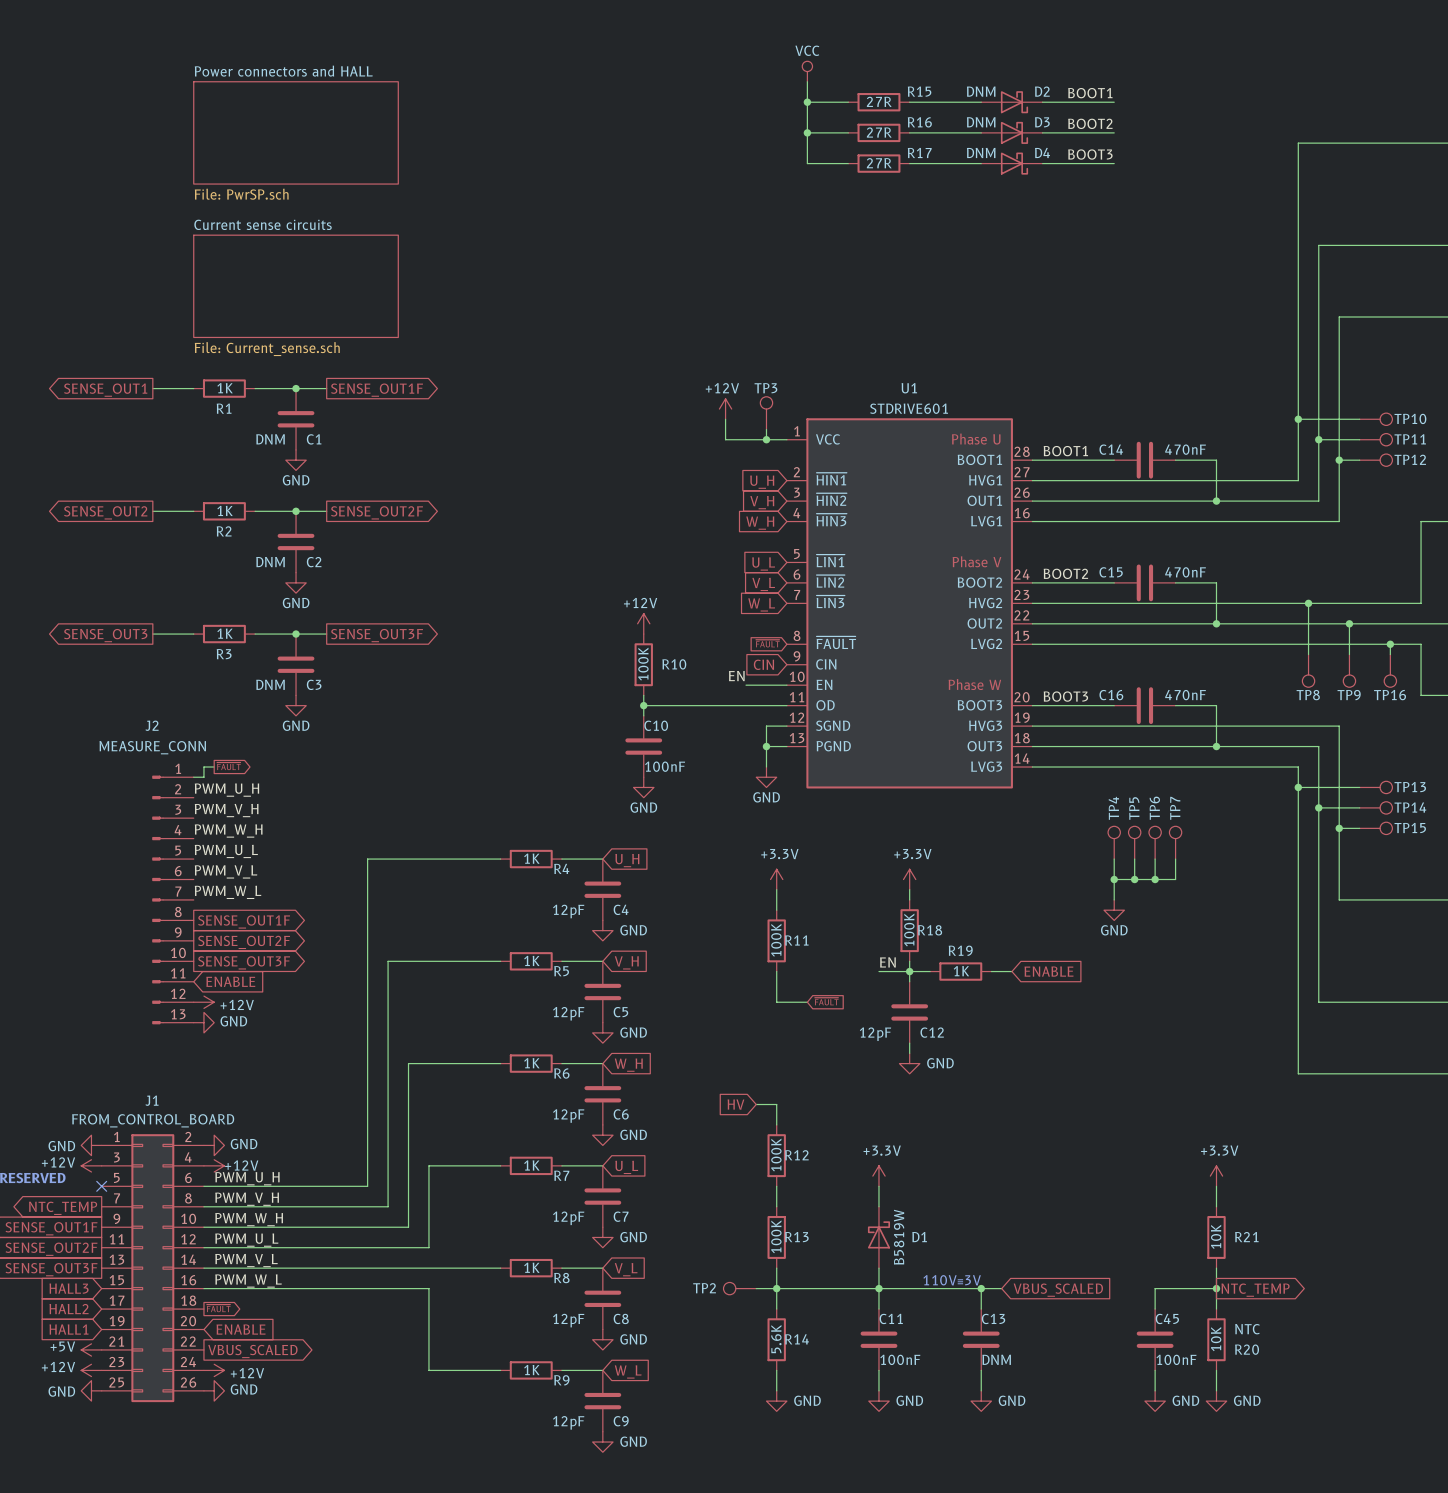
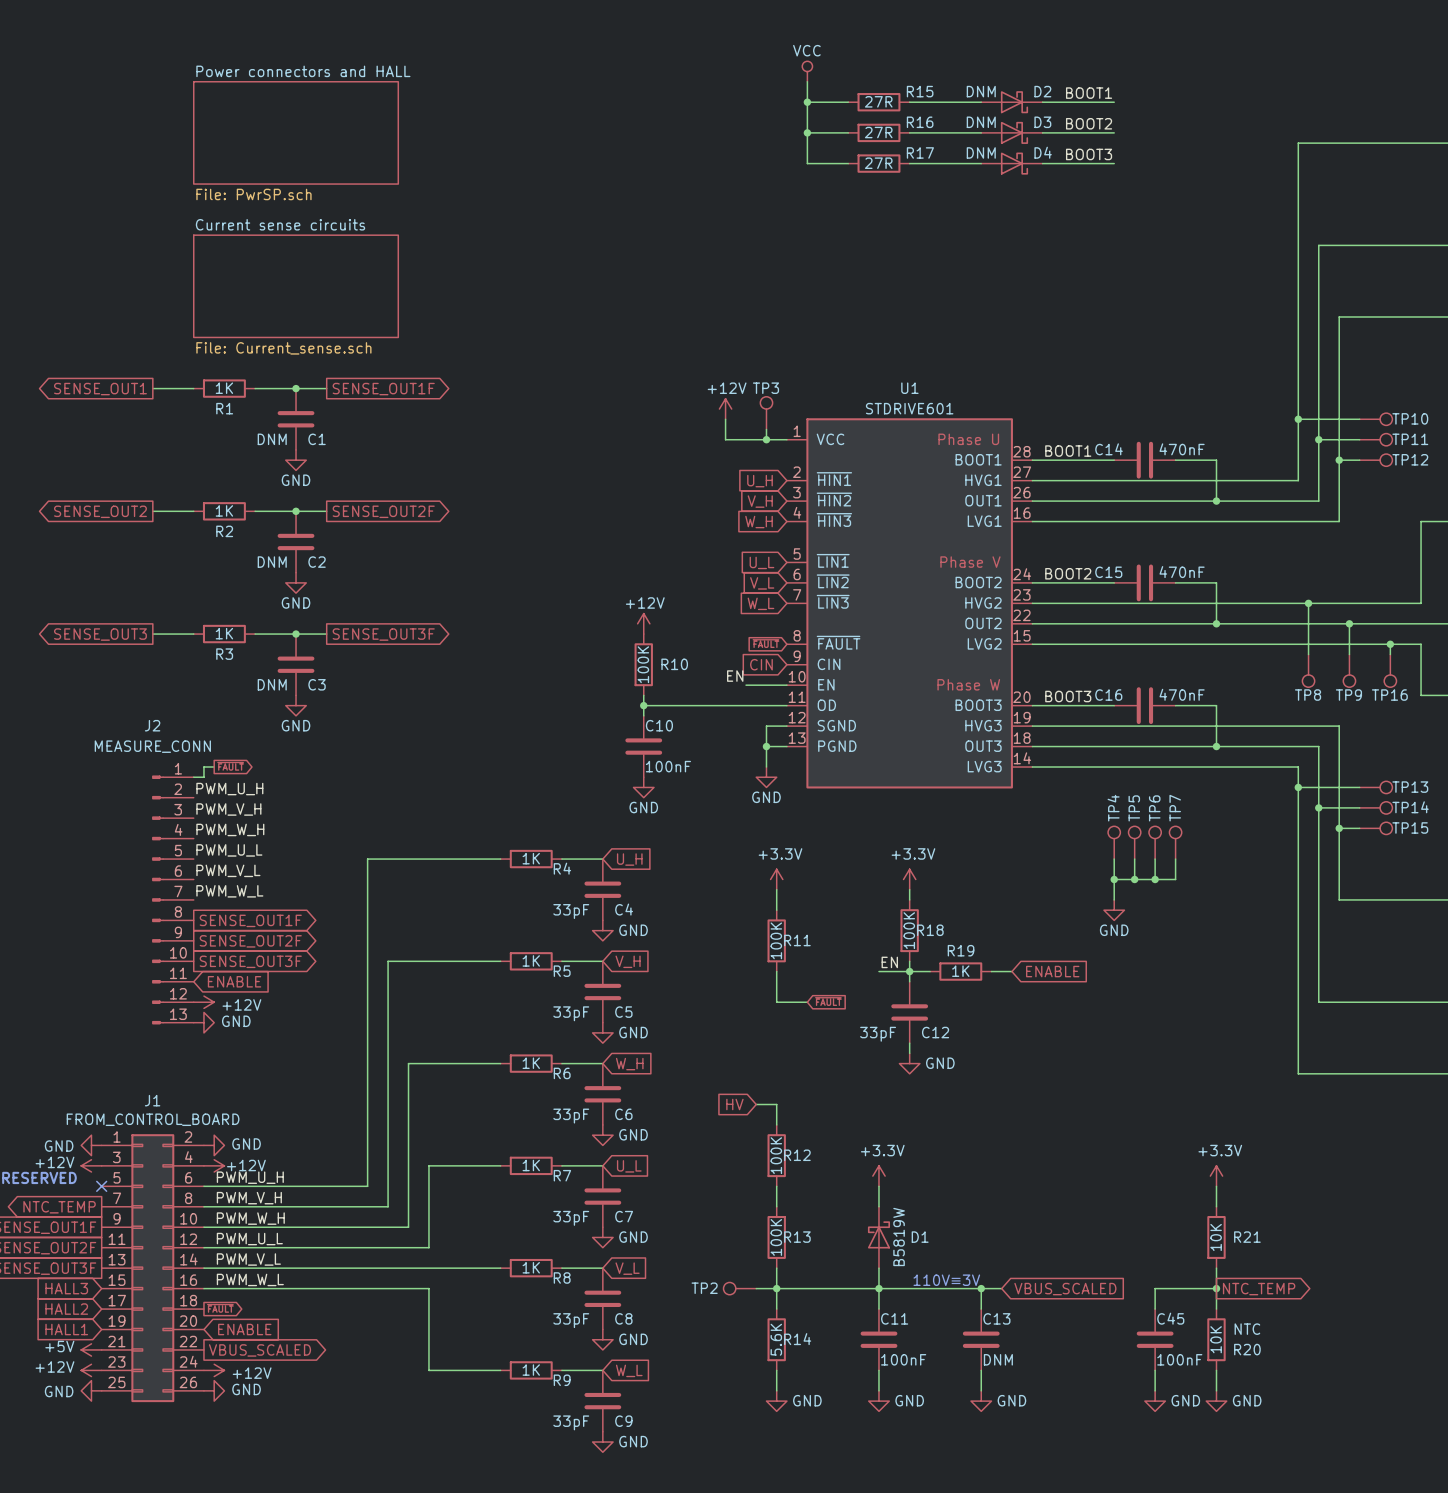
C4 value: 12pF (568, 911) -> 33pF (571, 911)
C5 value: 12pF (568, 1013) -> 33pF (571, 1013)
C12 value: 12pF (875, 1034) -> 33pF (878, 1034)
C6 value: 12pF (568, 1116) -> 33pF (571, 1116)
C7 value: 12pF (568, 1218) -> 33pF (571, 1218)
C8 value: 12pF (568, 1320) -> 33pF (571, 1320)
C9 value: 12pF (568, 1422) -> 33pF (571, 1422)

